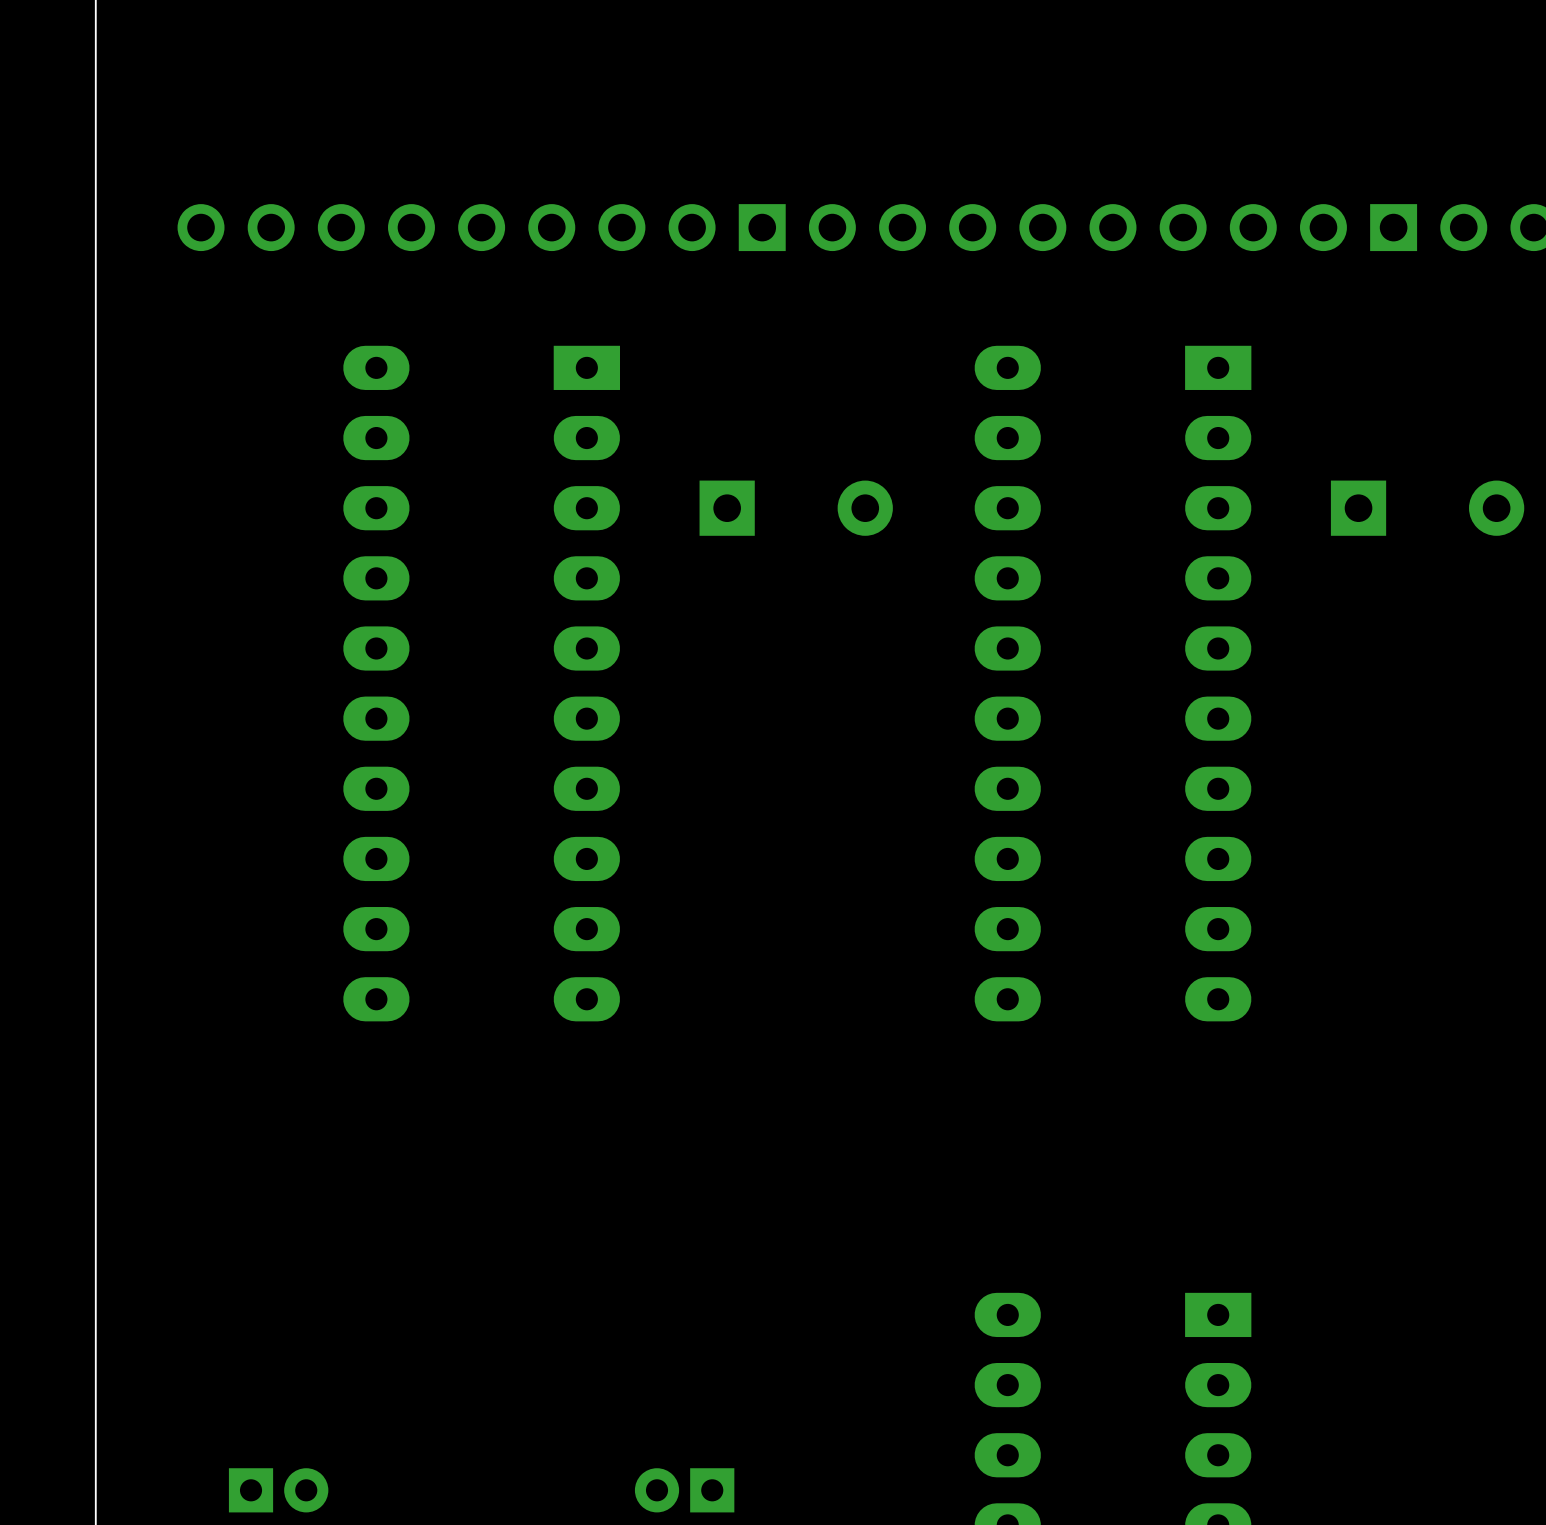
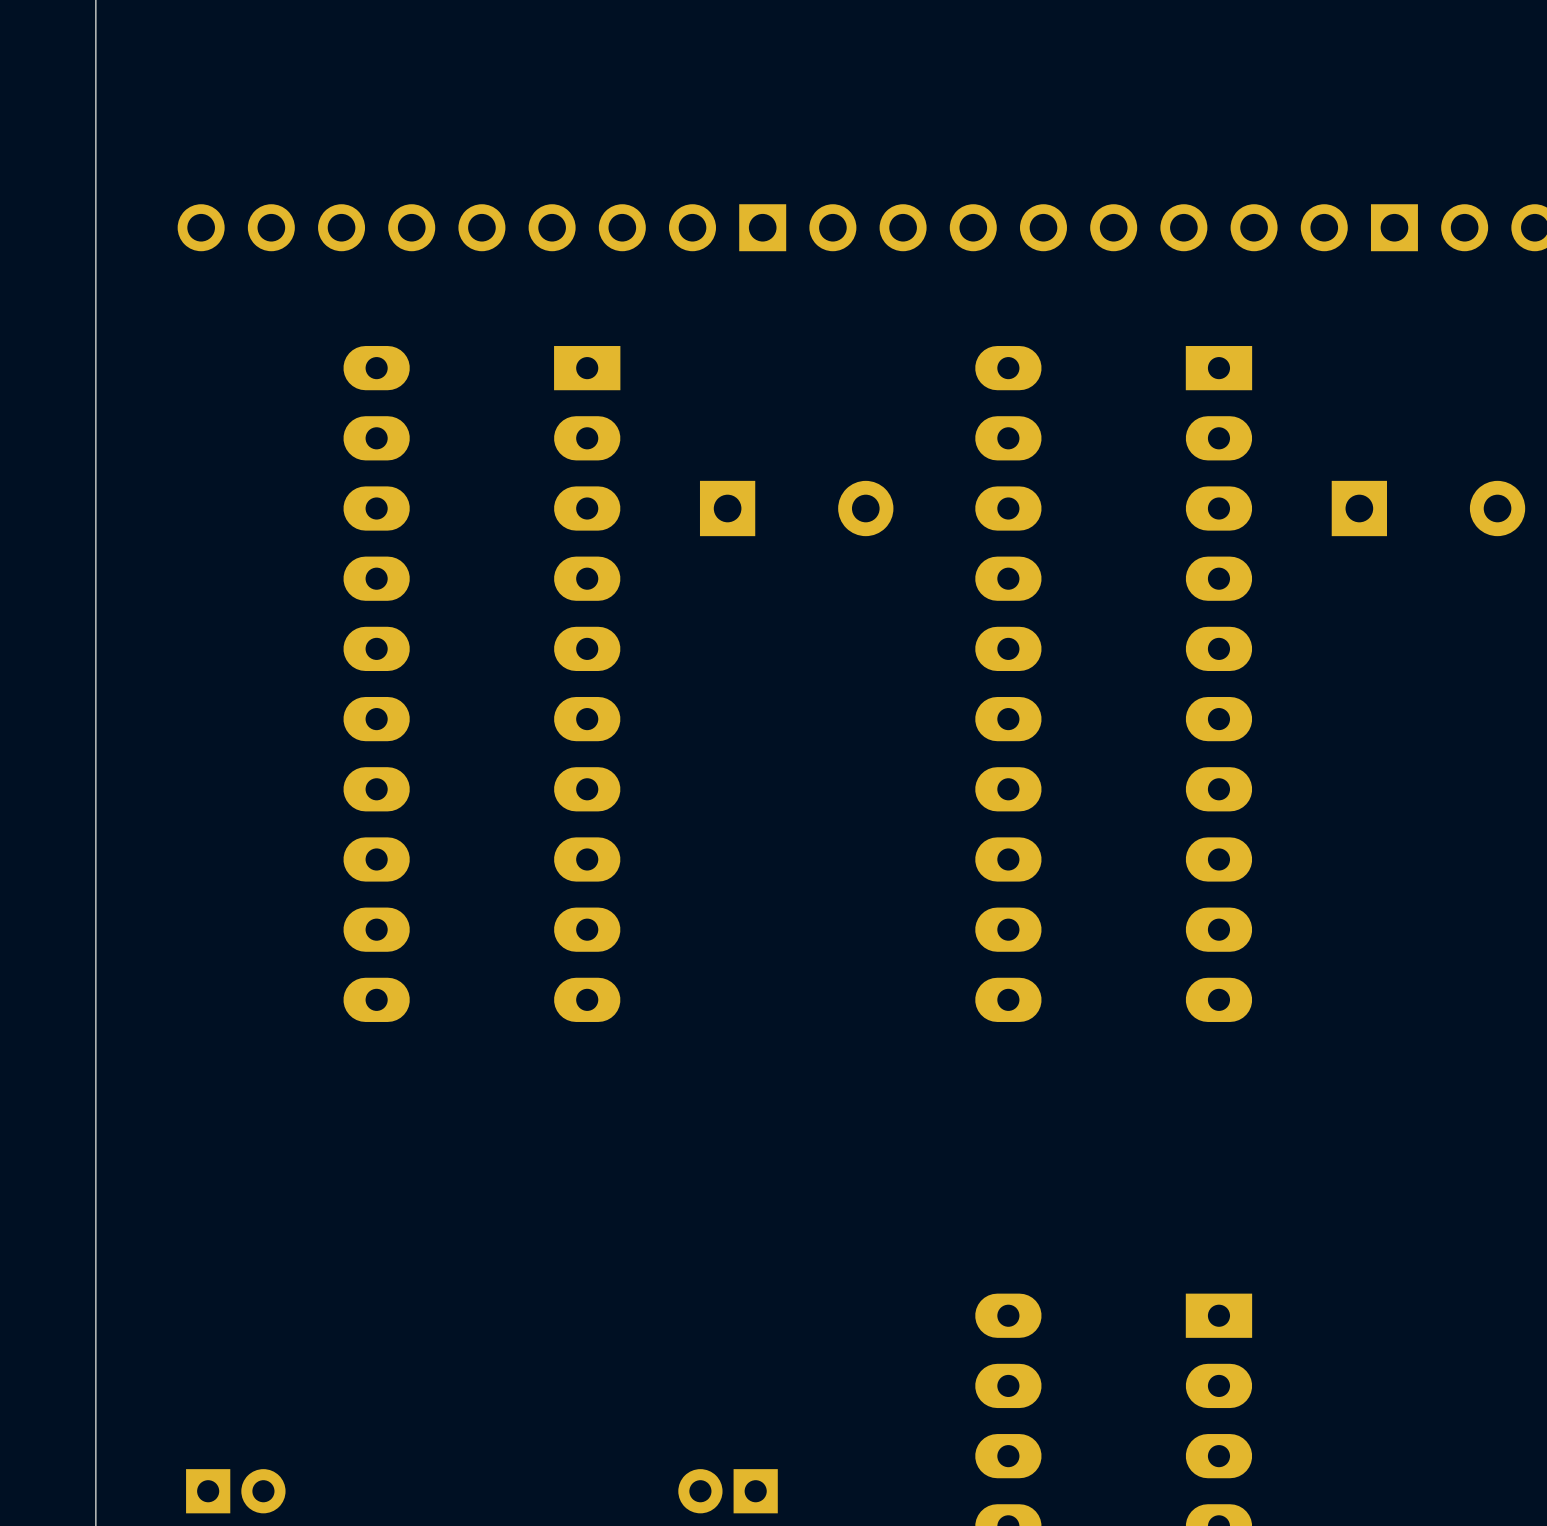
part position: (278, 1490) -> (235, 1491)
part position: (684, 1490) -> (728, 1491)

